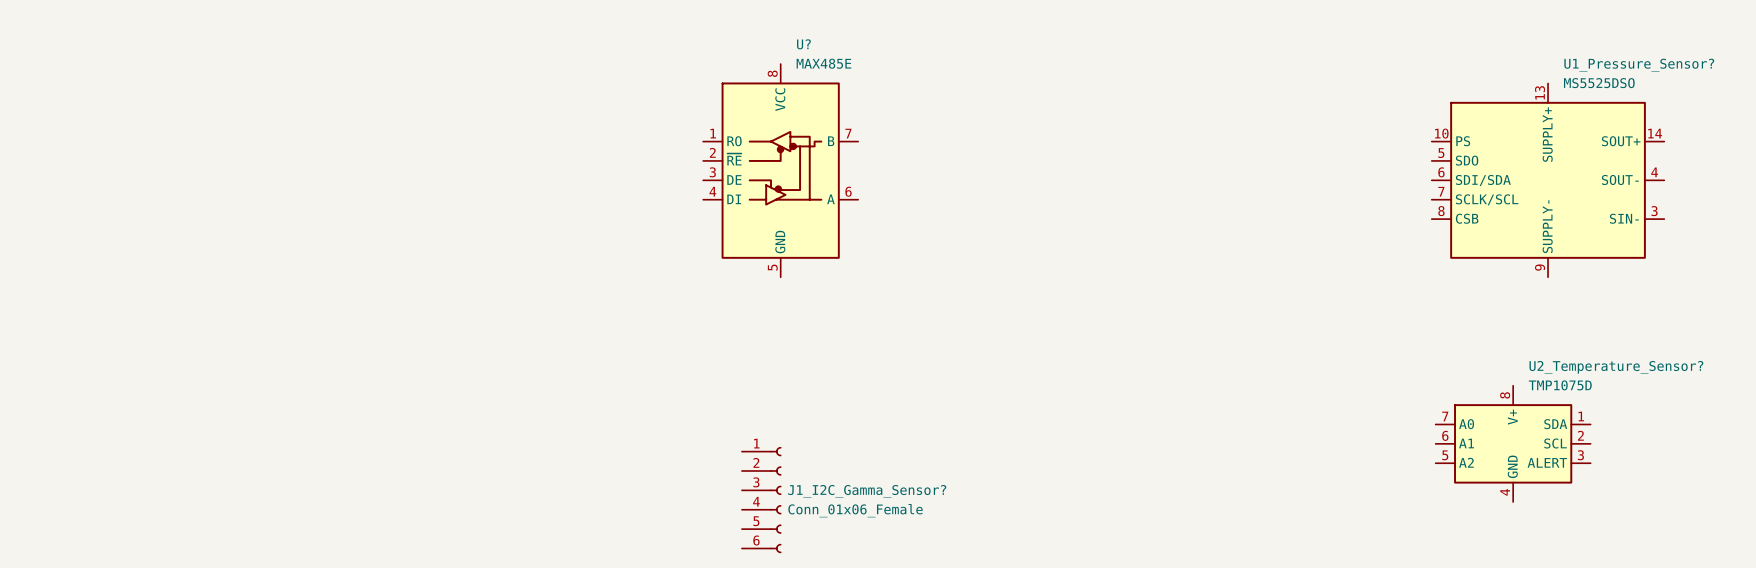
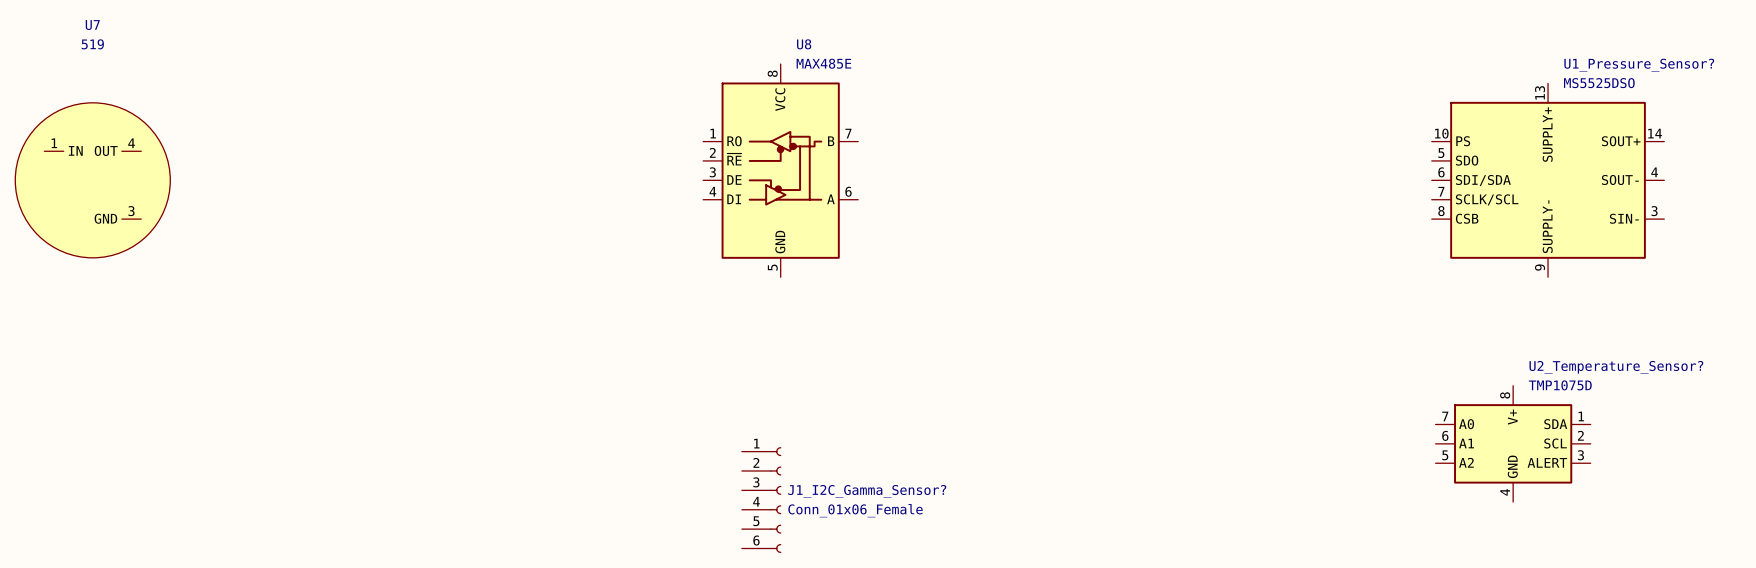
U? name: U? (803, 44) -> U8 (804, 44)
U7: none -> 519 (92, 180)

